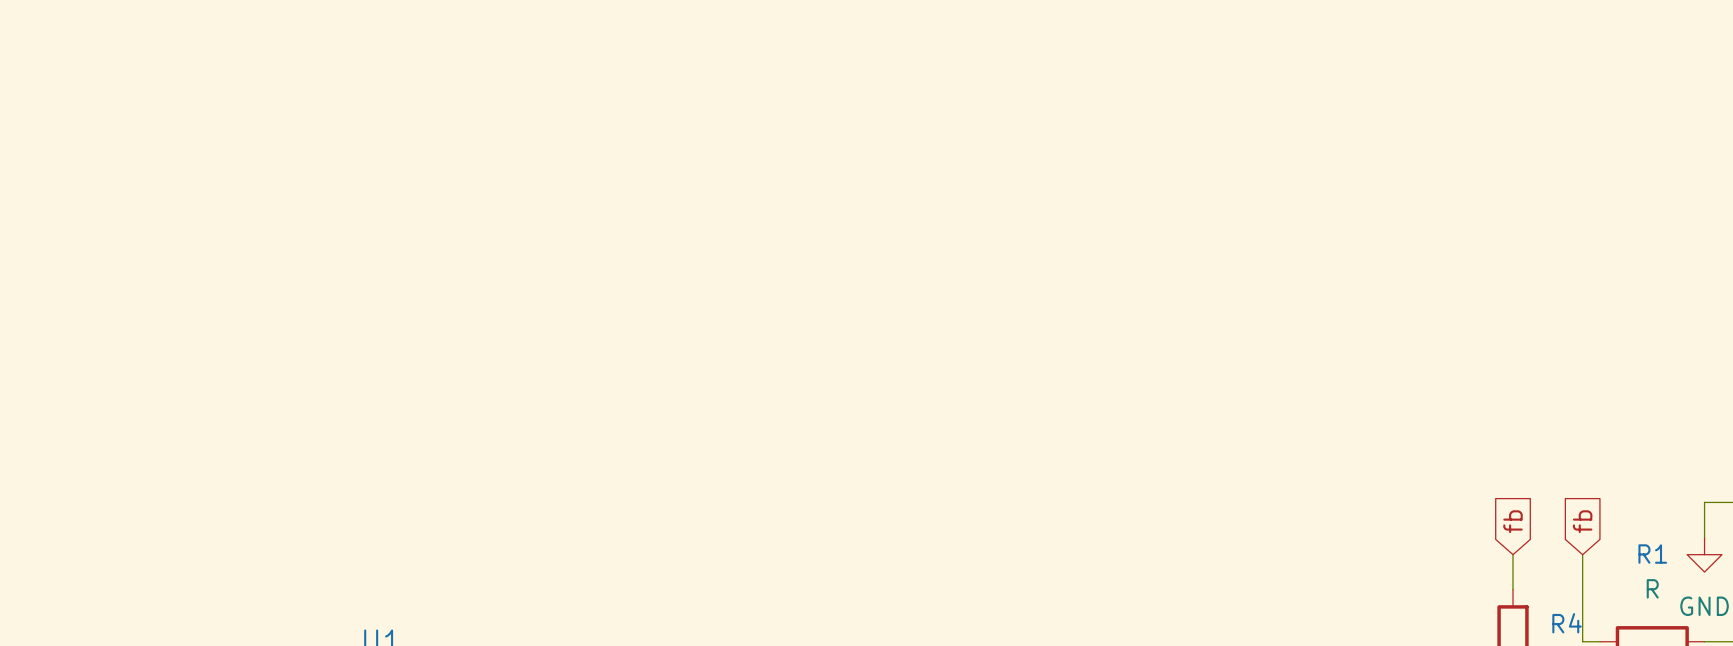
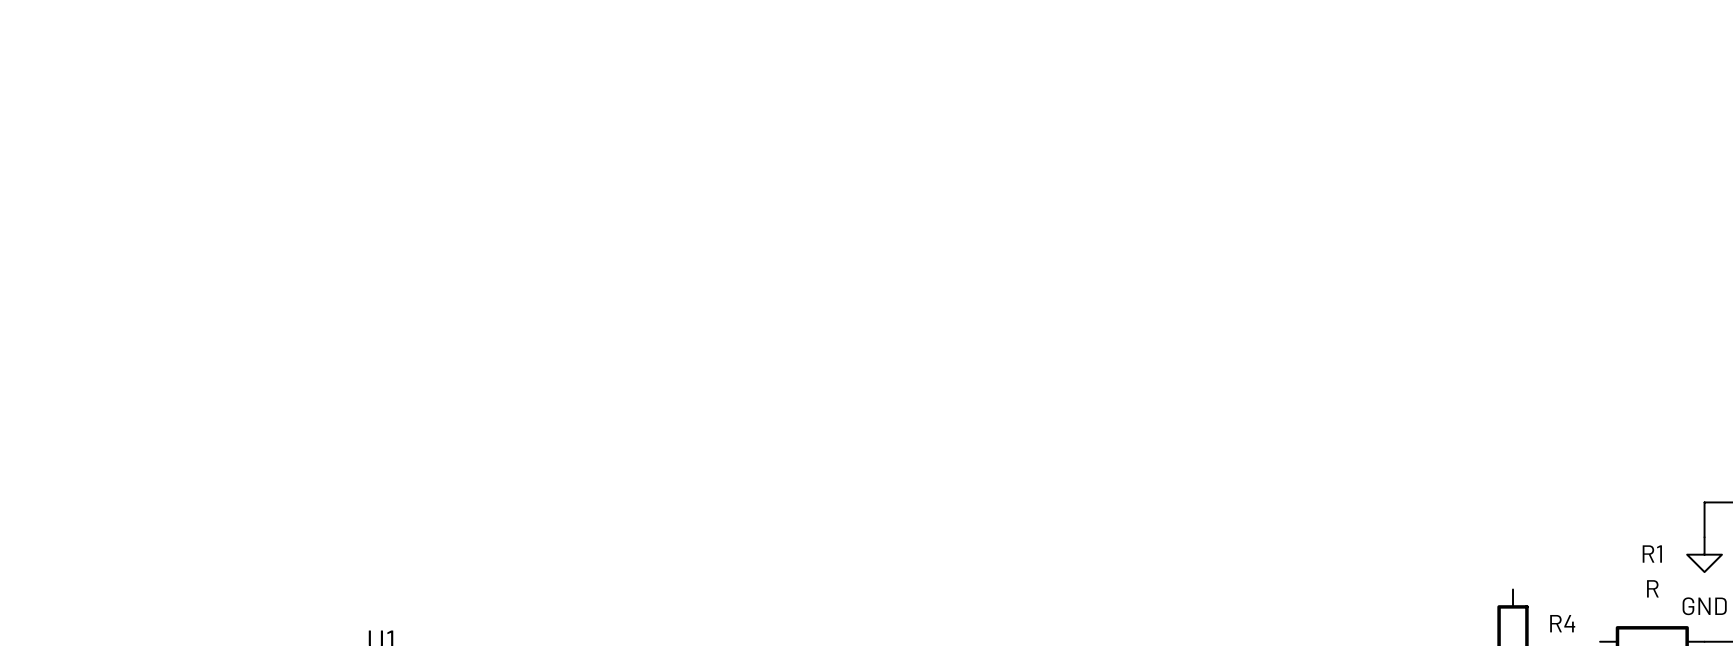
global label: fb (1513, 521) -> none
global label: fb (1582, 521) -> none
wire: (1513, 554) (1513, 589) -> none
wire: (1582, 554) (1582, 641) (1600, 641) -> none

